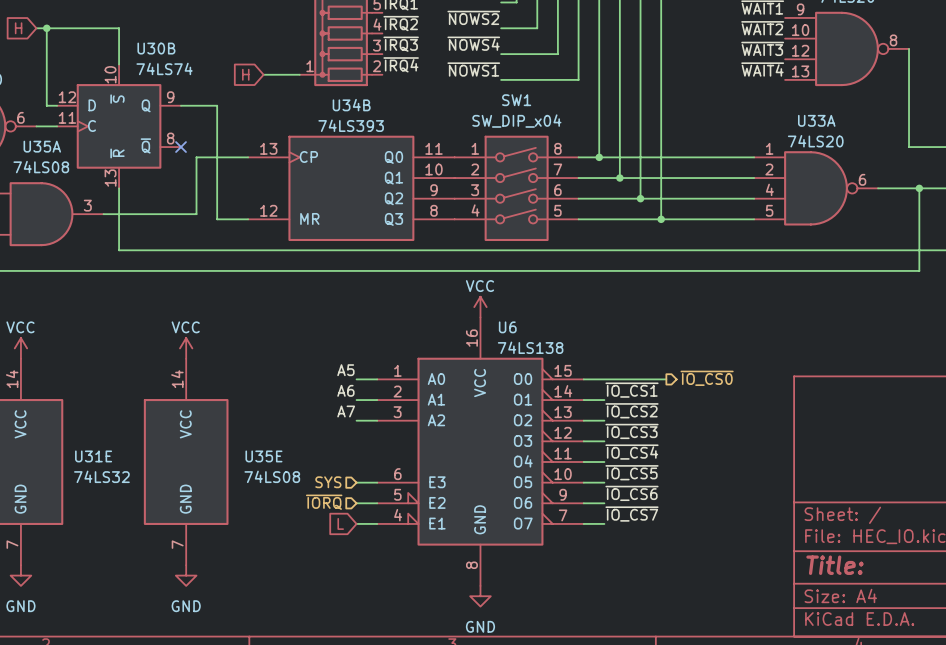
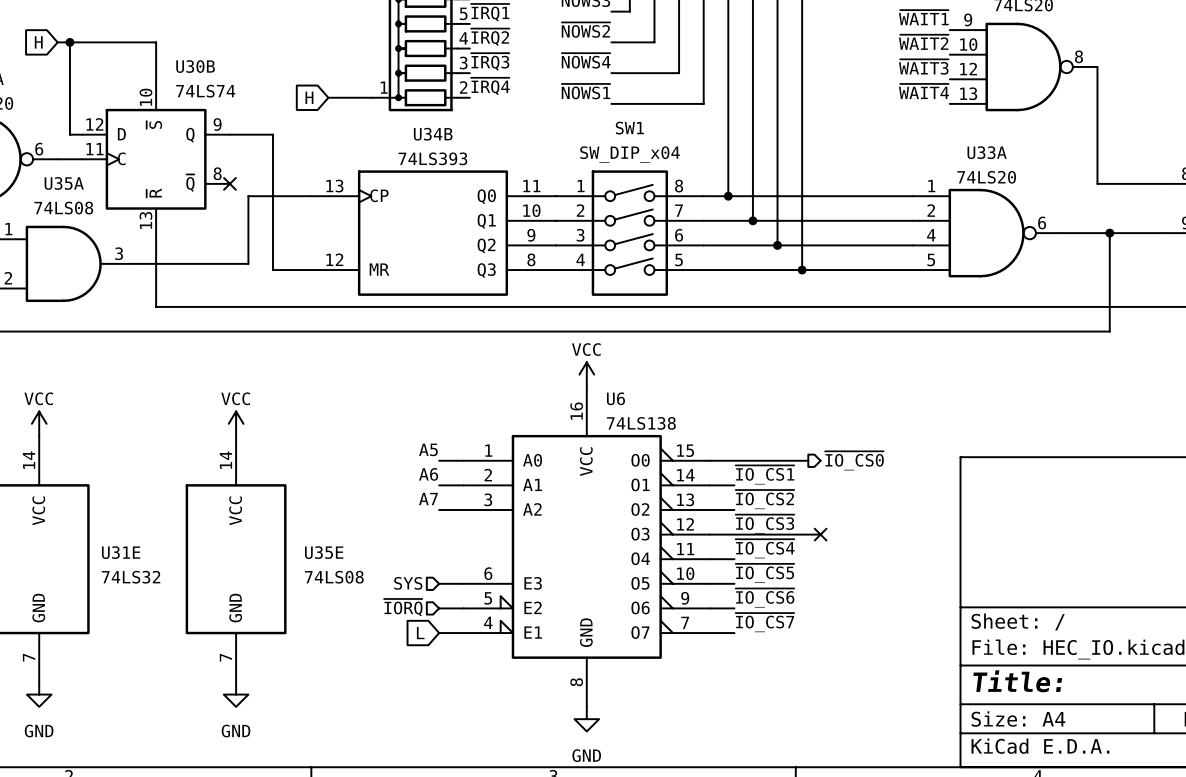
wire: none -> (734, 534) (820, 534)
no-connect mark: none -> (820, 534)

